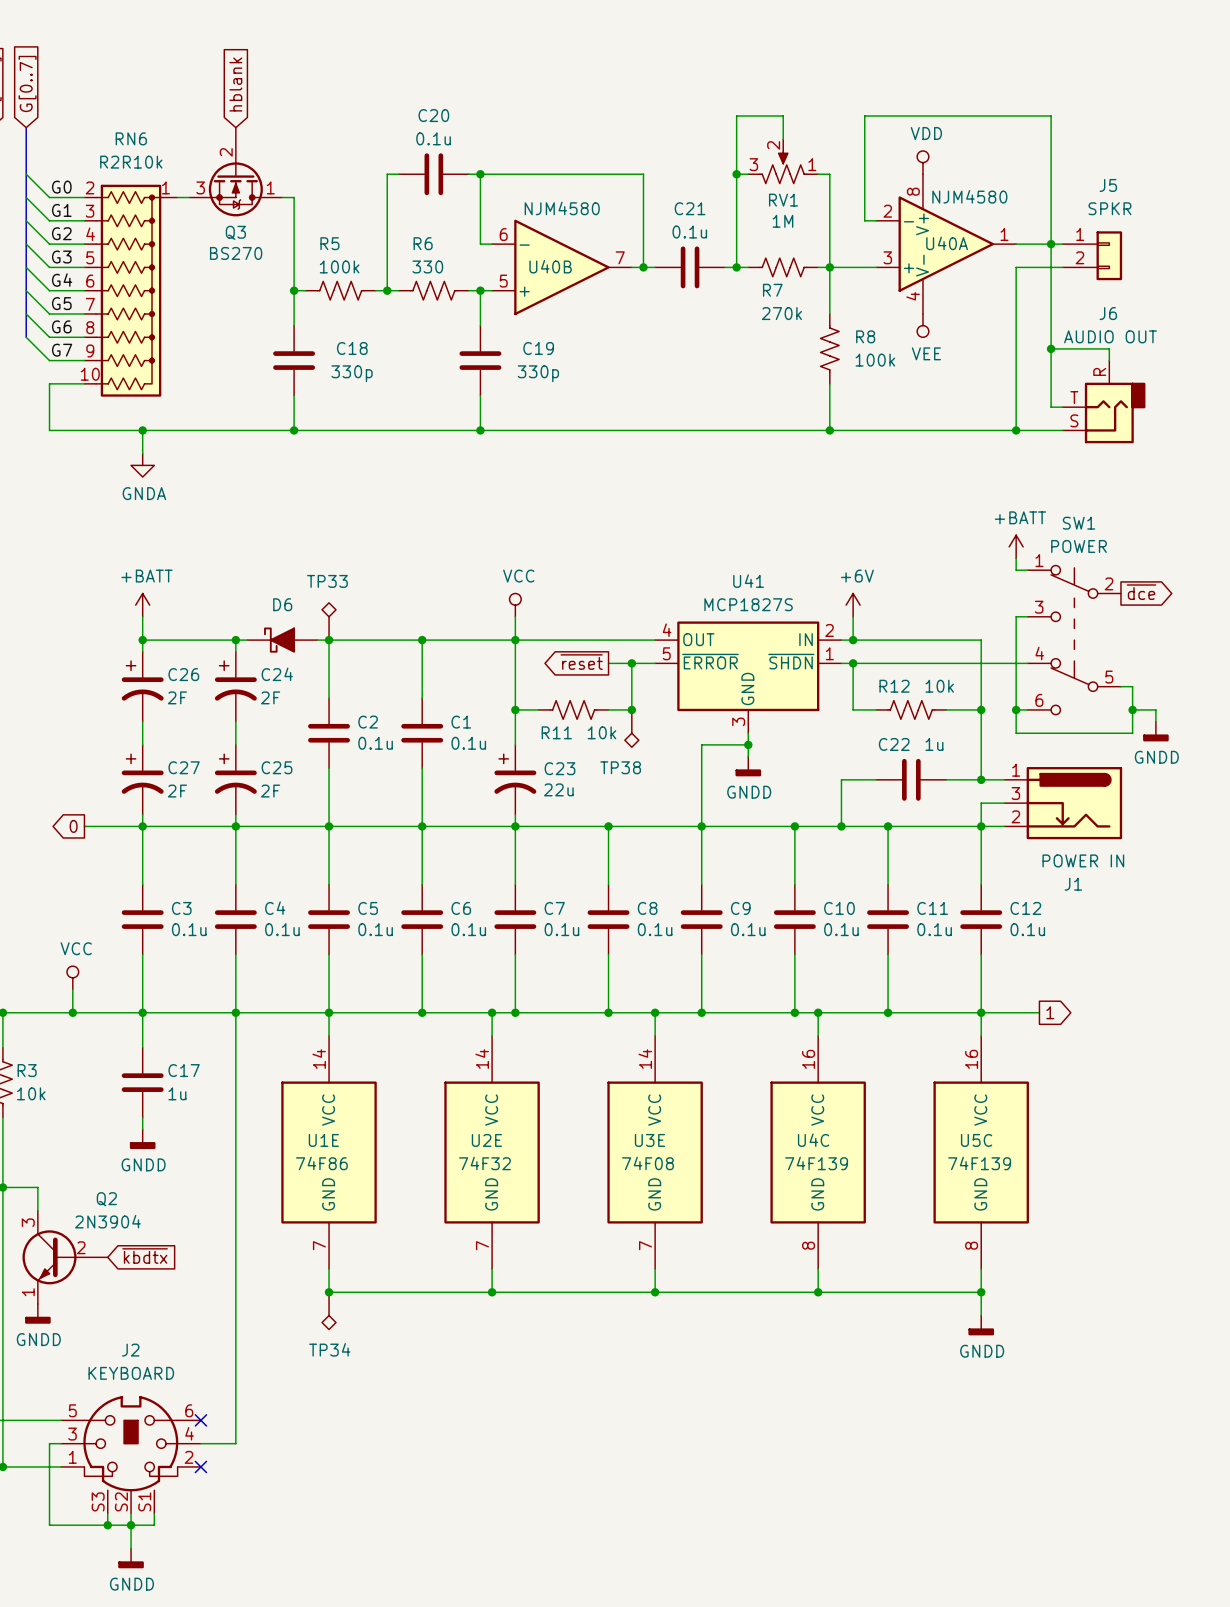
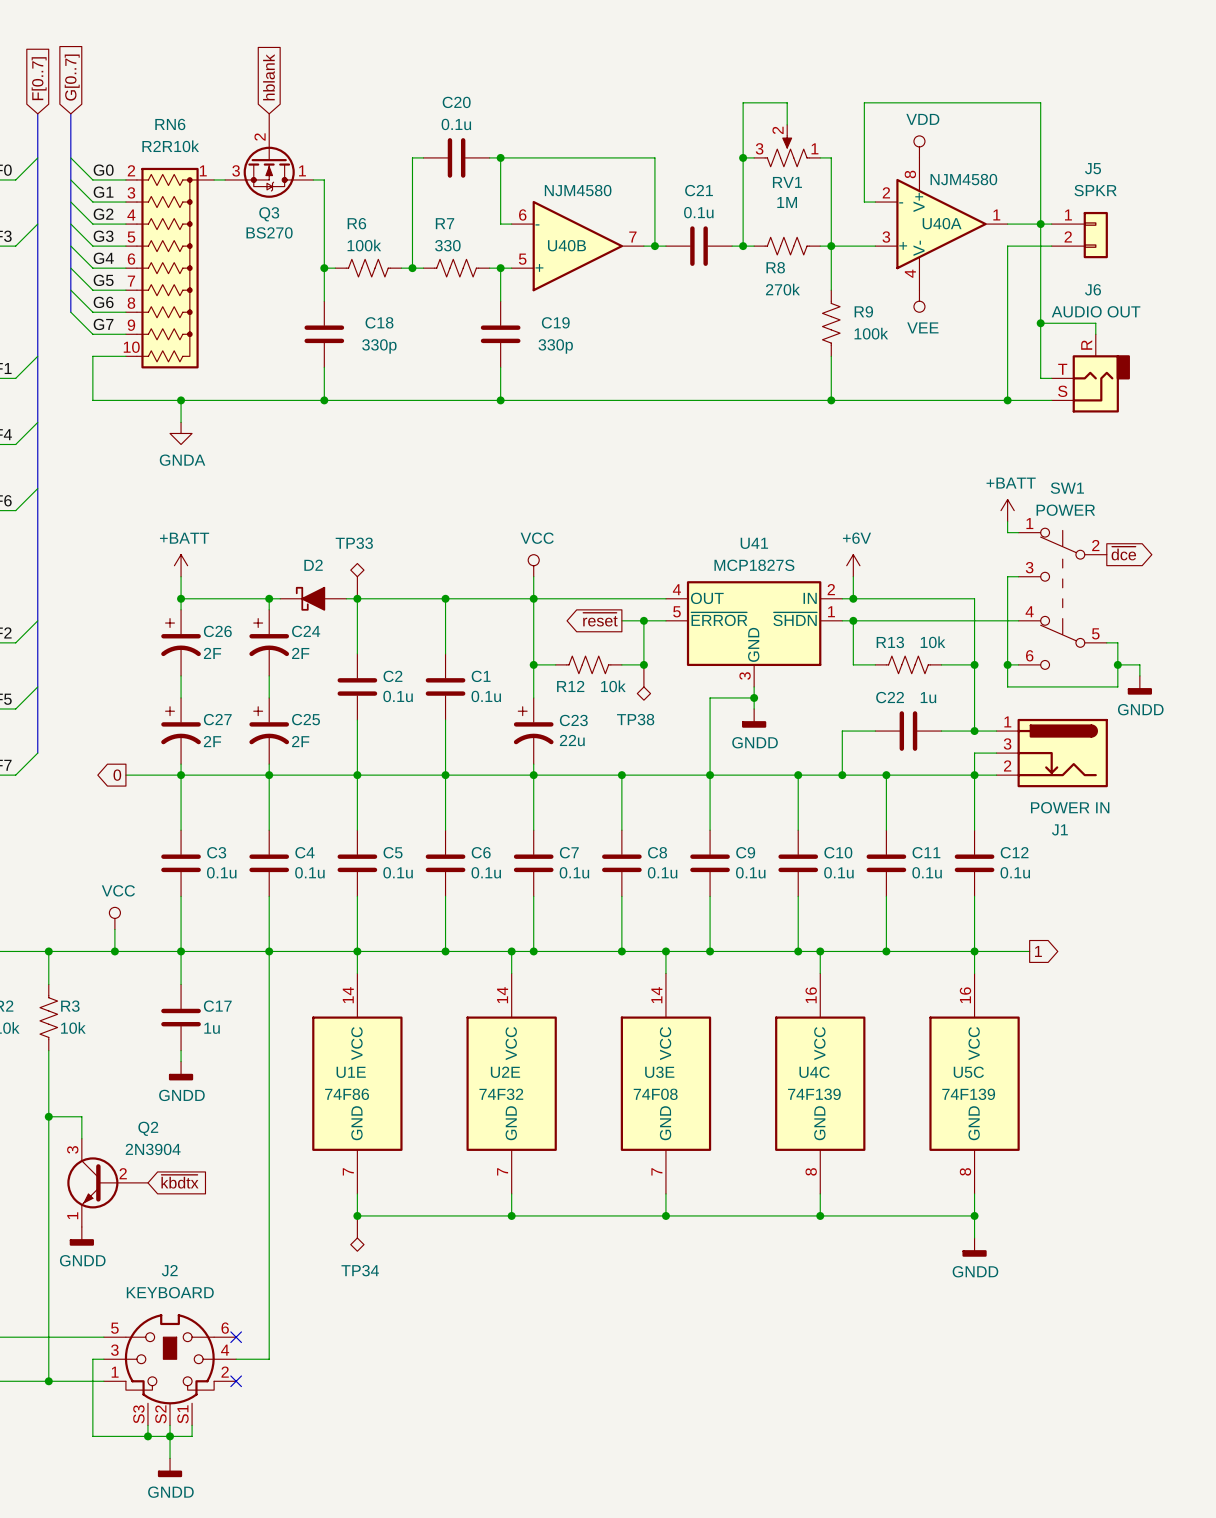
R5 name: R5 (329, 243) -> R6 (356, 223)
R6 name: R6 (423, 243) -> R7 (445, 223)
R7 name: R7 (772, 290) -> R8 (775, 267)
R8 name: R8 (865, 336) -> R9 (863, 311)
D6 name: D6 (282, 604) -> D2 (313, 565)
R12 name: R12 (894, 686) -> R13 (890, 642)
R11 name: R11 (556, 732) -> R12 (570, 686)

